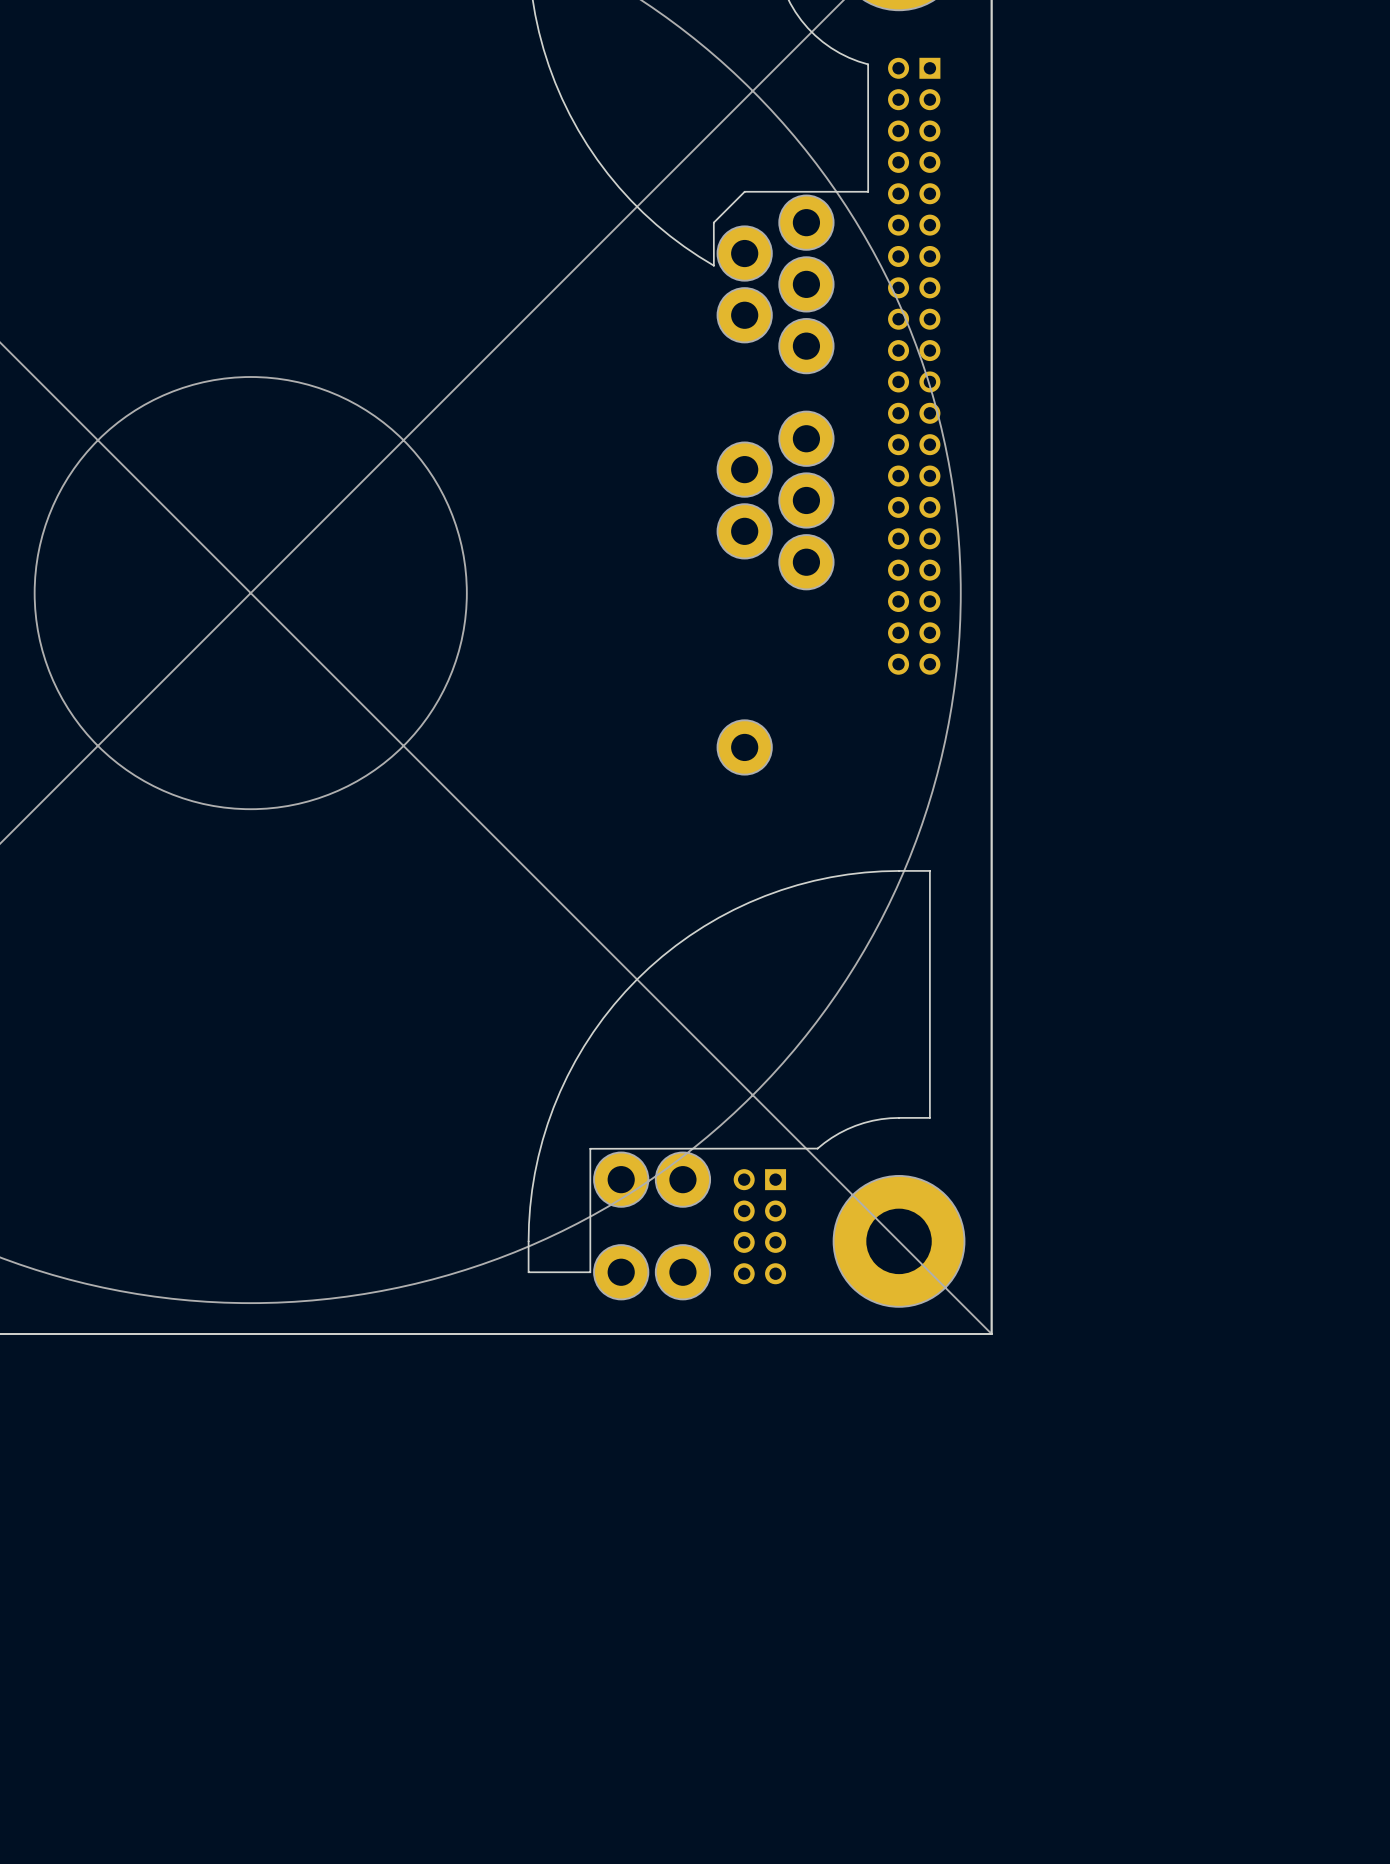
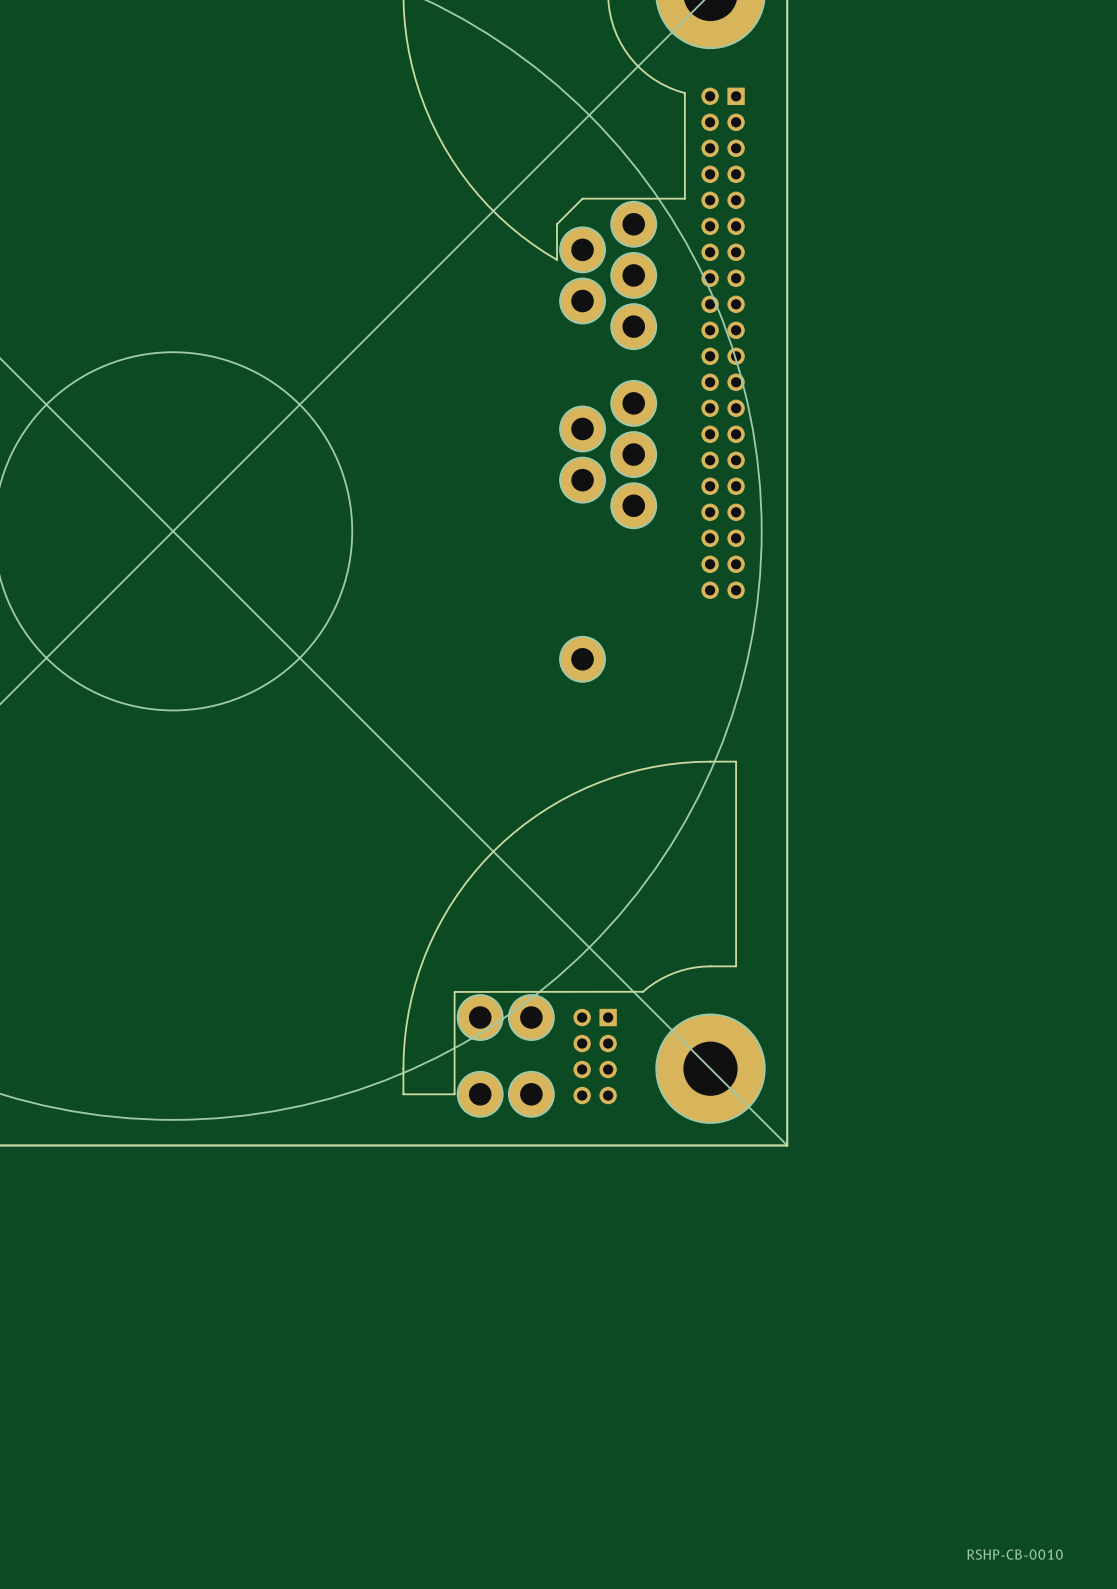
text: none -> RSHP-CB-0010 (1015, 1554)

